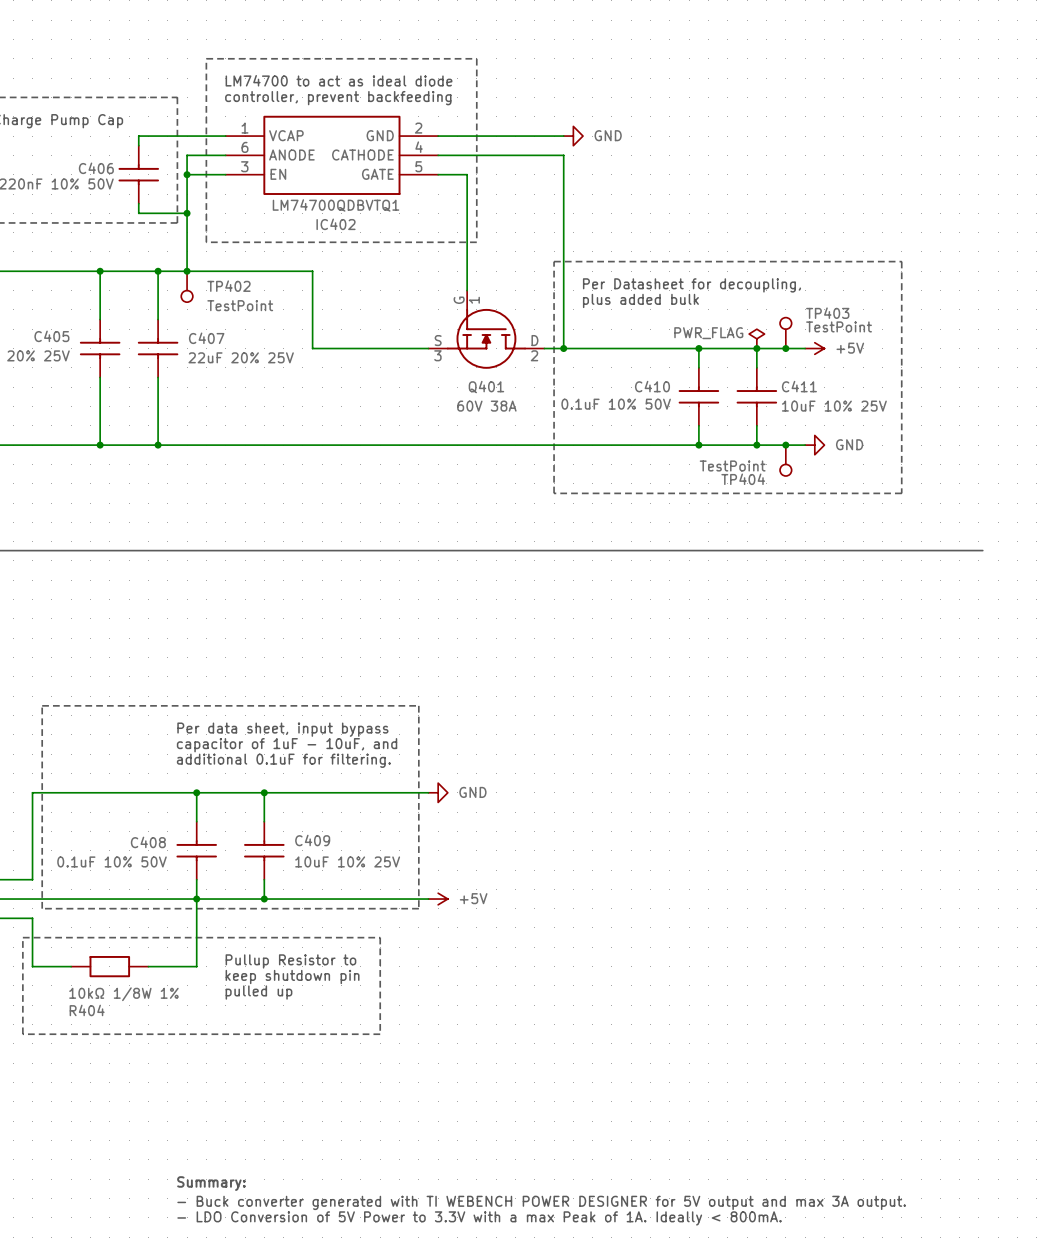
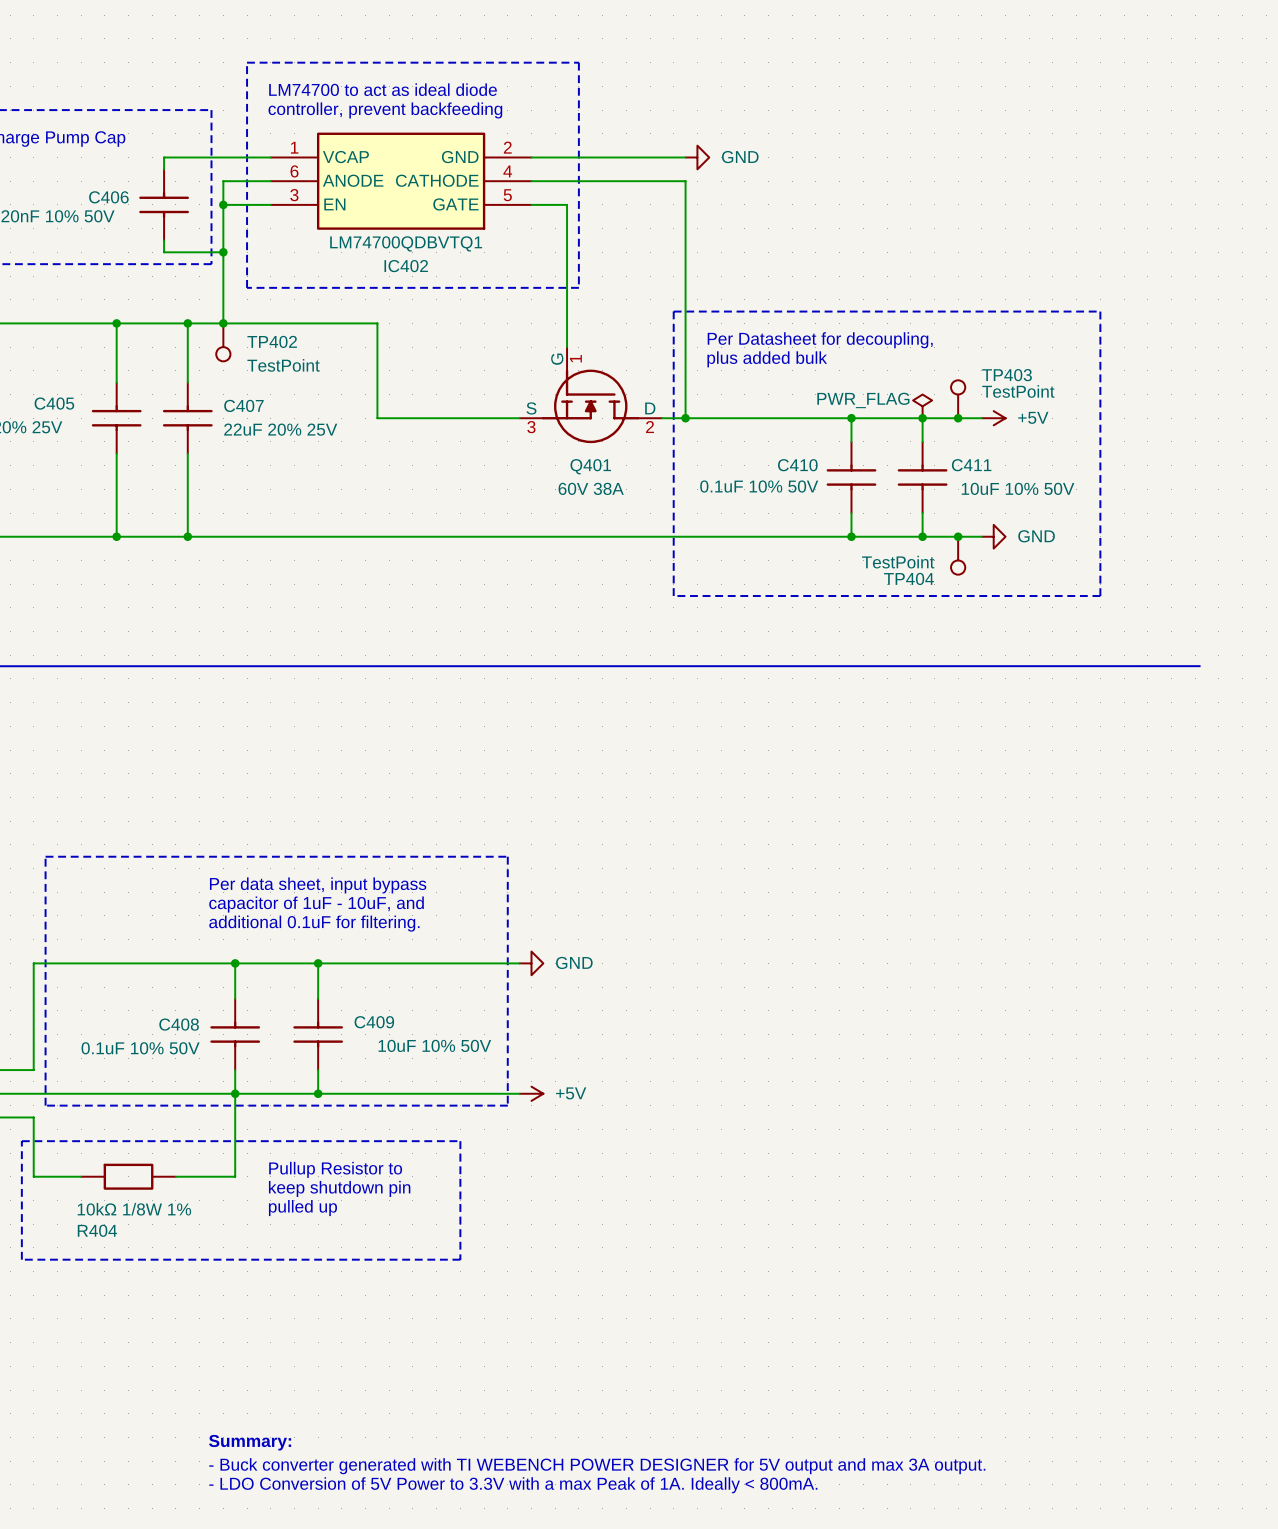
C411 value: 10uF 10% 25V (834, 406) -> 10uF 10% 50V (1018, 488)
C409 value: 10uF 10% 25V (347, 861) -> 10uF 10% 50V (434, 1045)

